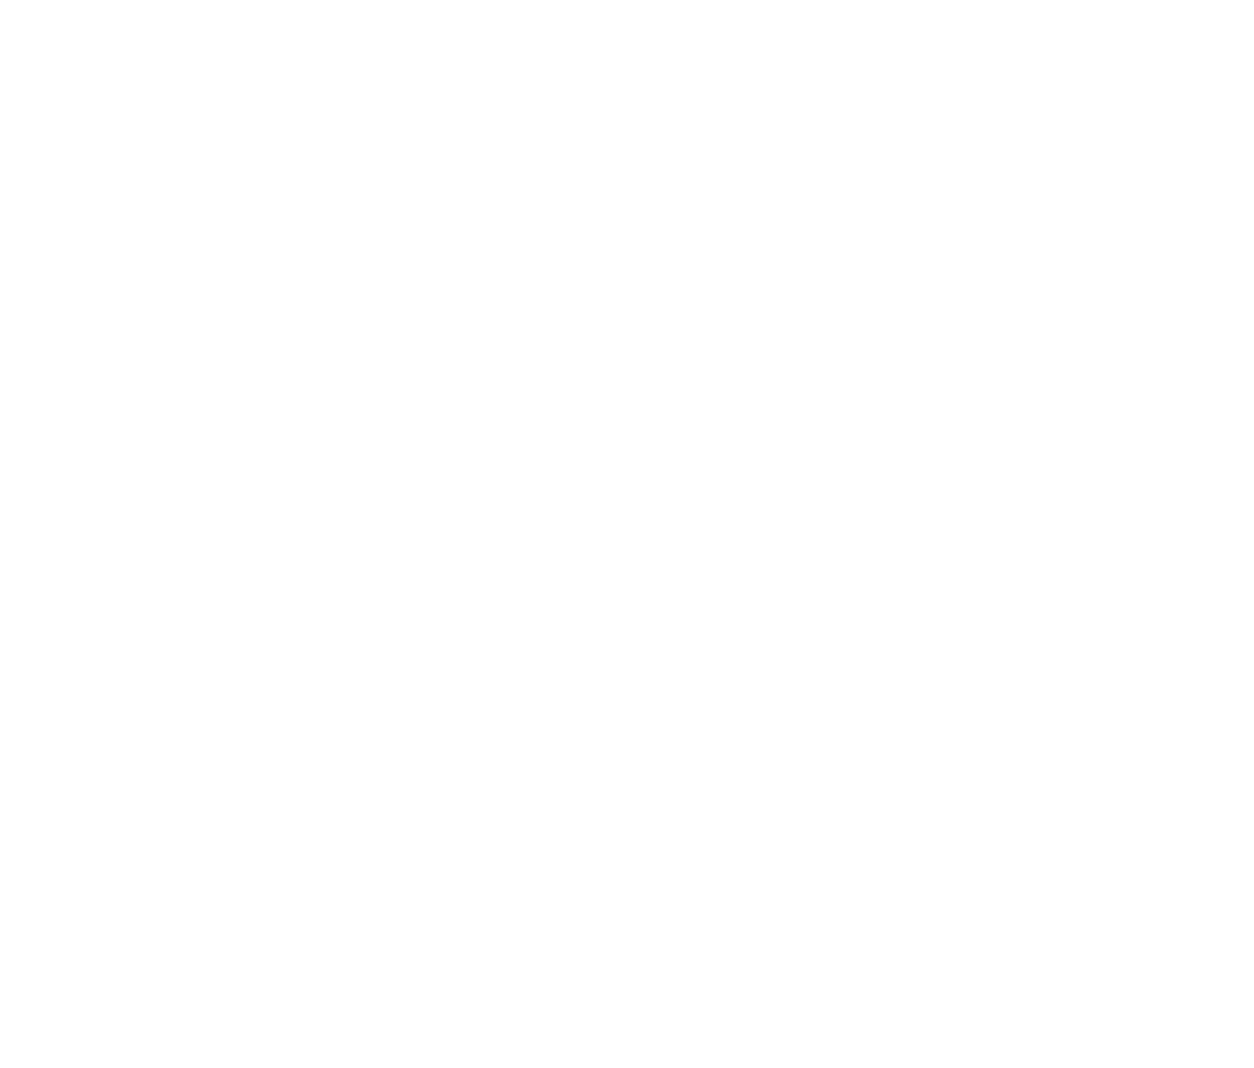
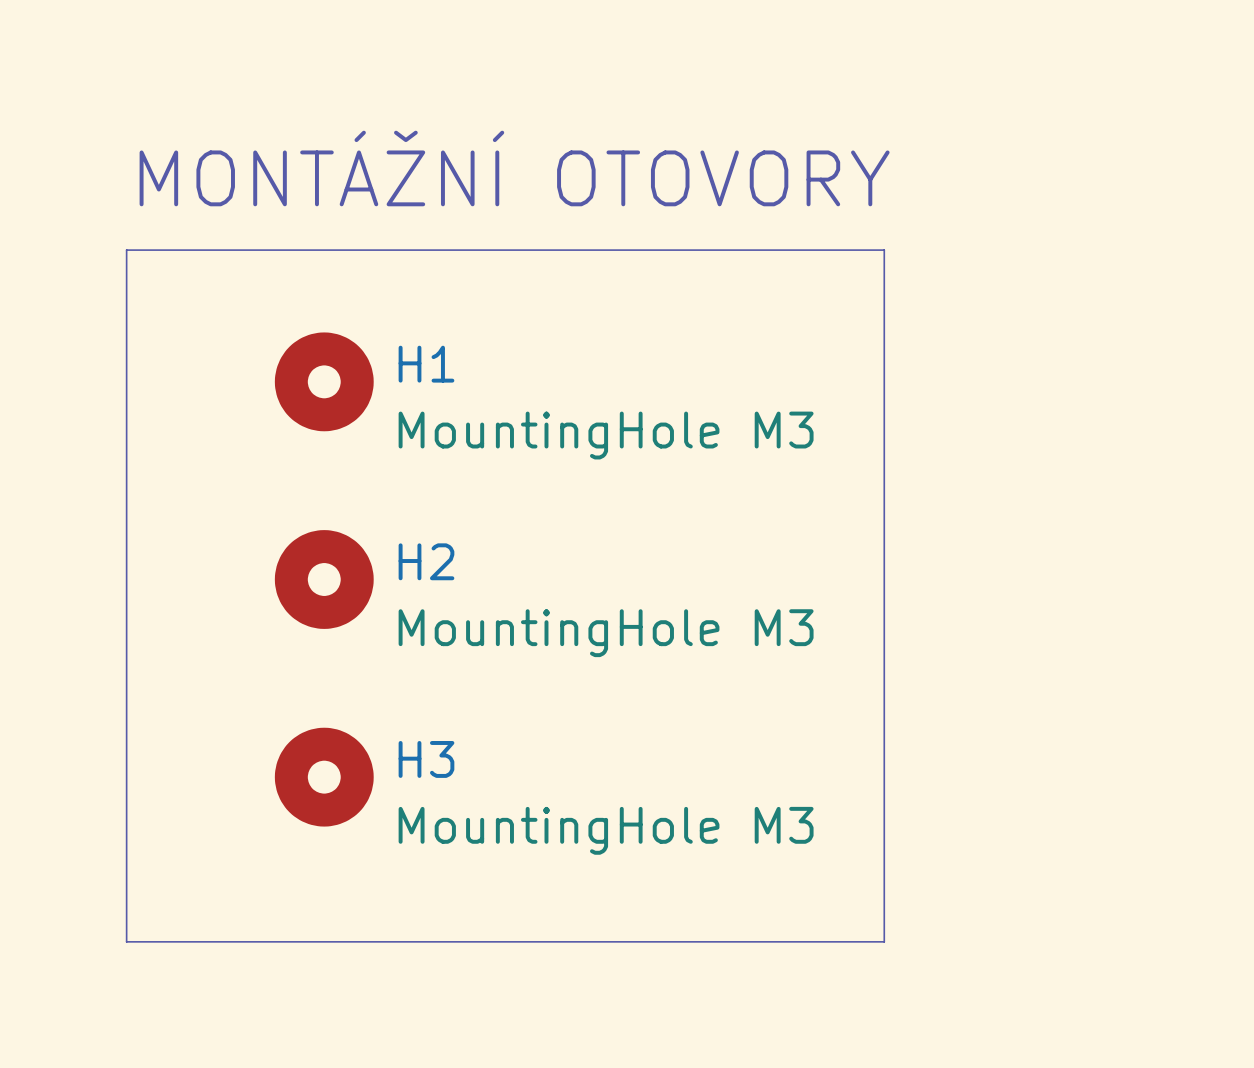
text: none -> MONTÁŽNÍ OTOVORY (514, 168)
line: none -> (126, 250) (884, 250) (884, 941) (126, 941) (126, 250)
H1: none -> MountingHole M3 (324, 381)
H2: none -> MountingHole M3 (324, 579)
H3: none -> MountingHole M3 (324, 777)

